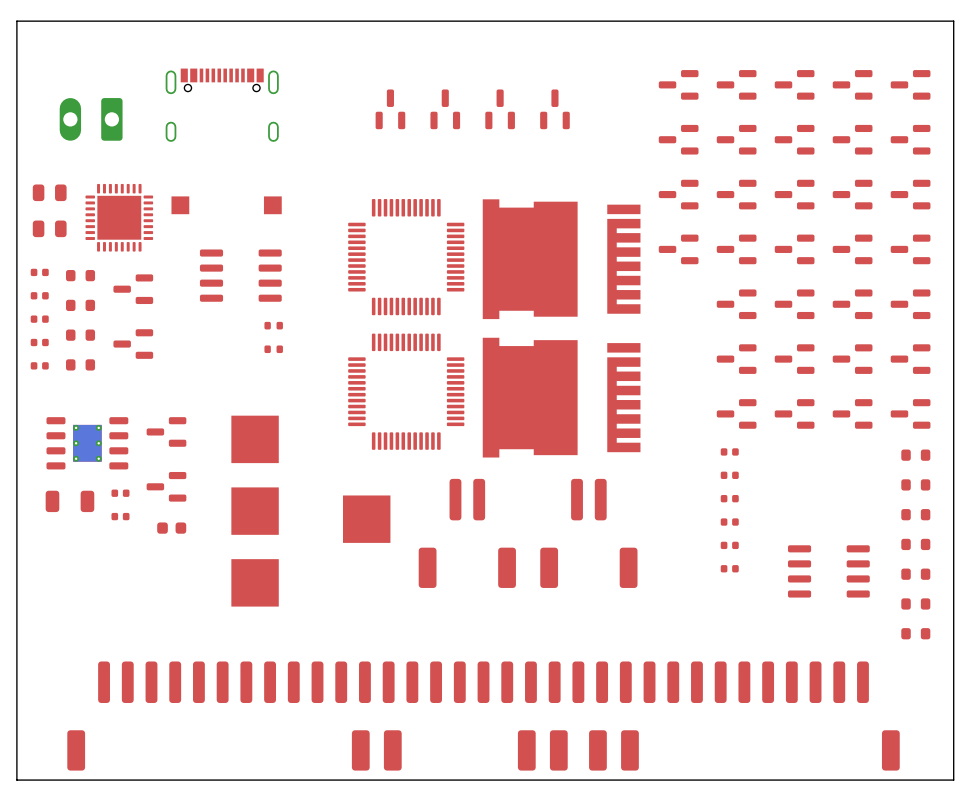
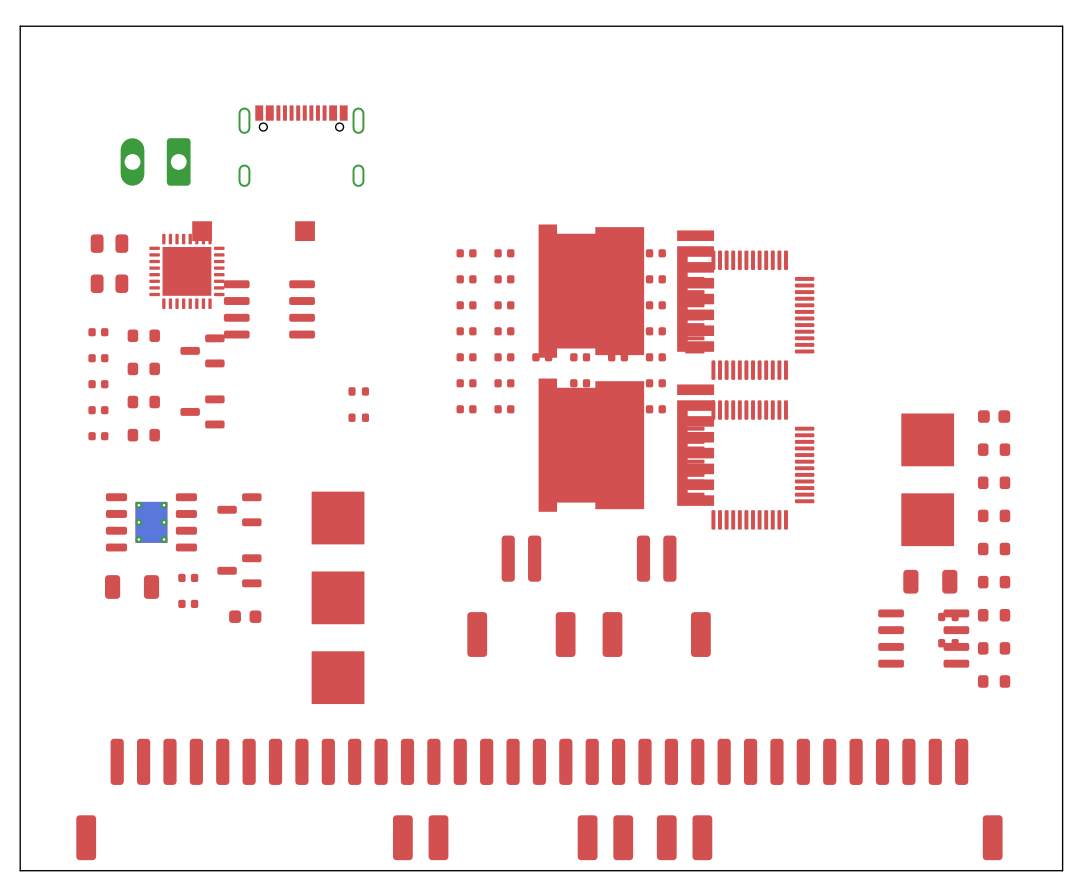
part: (678, 84) -> none
part: (736, 84) -> none
part: (794, 84) -> none
part: (852, 84) -> none
part: (910, 84) -> none
part position: (222, 105) -> (301, 146)
part: (390, 109) -> none
part: (445, 109) -> none
part: (500, 109) -> none
part: (554, 109) -> none
part position: (91, 119) -> (155, 161)
part: (678, 139) -> none
part: (736, 139) -> none
part: (794, 139) -> none
part: (852, 139) -> none
part: (910, 139) -> none
part: (49, 192) -> none
part: (678, 194) -> none
part: (736, 194) -> none
part: (794, 194) -> none
part: (852, 194) -> none
part: (910, 194) -> none
part: none -> (109, 243)
part position: (119, 217) -> (186, 271)
part: none -> (466, 253)
part: none -> (504, 253)
part: none -> (655, 253)
part: (49, 228) -> none
part: none -> (466, 279)
part: none -> (504, 279)
part: none -> (655, 279)
part: (678, 249) -> none
part: (736, 249) -> none
part: (794, 249) -> none
part: (852, 249) -> none
part: (910, 249) -> none
part: none -> (109, 283)
part: (406, 257) -> none
part: none -> (466, 305)
part: none -> (504, 305)
part: none -> (655, 305)
part: (39, 272) -> none
part footprint: [113, 274, 154, 305] -> [127, 329, 160, 343]
part: (80, 275) -> none
part: none -> (749, 315)
part: (39, 295) -> none
part: none -> (466, 331)
part: none -> (504, 331)
part: none -> (655, 331)
part: none -> (98, 332)
part: (736, 304) -> none
part: (794, 304) -> none
part: (852, 304) -> none
part: (910, 304) -> none
part: (80, 305) -> none
part: none -> (202, 350)
part: none -> (466, 357)
part: none -> (504, 357)
part: none -> (542, 357)
part: none -> (580, 357)
part: none -> (618, 357)
part: none -> (655, 357)
part: (39, 319) -> none
part: none -> (98, 358)
part: (273, 325) -> none
part: none -> (143, 368)
part: (80, 335) -> none
part: (39, 342) -> none
part: none -> (98, 384)
part: none -> (466, 383)
part: none -> (504, 383)
part: none -> (580, 383)
part: none -> (655, 383)
part: (133, 344) -> none
part: (273, 349) -> none
part: none -> (358, 391)
part: none -> (143, 402)
part footprint: [65, 359, 96, 371] -> [88, 406, 109, 415]
part: (736, 359) -> none
part: (794, 359) -> none
part: (852, 359) -> none
part: (910, 359) -> none
part: (39, 365) -> none
part: none -> (466, 409)
part: none -> (504, 409)
part: none -> (655, 409)
part: none -> (202, 411)
part: none -> (994, 416)
part: none -> (358, 417)
part: none -> (143, 435)
part: none -> (98, 436)
part: (406, 391) -> none
part: none -> (927, 439)
part: none -> (994, 449)
part: (736, 413) -> none
part: (794, 413) -> none
part: (852, 413) -> none
part: (910, 413) -> none
part: none -> (749, 464)
part: (166, 431) -> none
part: none -> (994, 482)
part: (255, 439) -> none
part position: (87, 443) -> (151, 522)
part: (729, 451) -> none
part: none -> (239, 509)
part: (915, 455) -> none
part: none -> (994, 515)
part: none -> (338, 518)
part: none -> (927, 519)
part: (729, 475) -> none
part: (915, 484) -> none
part: (166, 486) -> none
part: none -> (994, 549)
part: (120, 493) -> none
part: (729, 498) -> none
part: (69, 501) -> none
part: none -> (239, 570)
part: (255, 511) -> none
part footprint: [111, 512, 130, 521] -> [105, 575, 160, 599]
part: (915, 514) -> none
part: none -> (188, 577)
part: (366, 519) -> none
part: none -> (930, 581)
part: none -> (994, 582)
part: (729, 522) -> none
part position: (171, 528) -> (245, 616)
part: none -> (338, 597)
part: none -> (188, 603)
part: (915, 544) -> none
part: (729, 545) -> none
part: none -> (994, 615)
part: none -> (948, 616)
part: (729, 568) -> none
part: (915, 574) -> none
part: none -> (948, 643)
part: none -> (994, 648)
part: (255, 582) -> none
part: (915, 603) -> none
part: none -> (338, 677)
part: none -> (994, 681)
part: (915, 633) -> none

